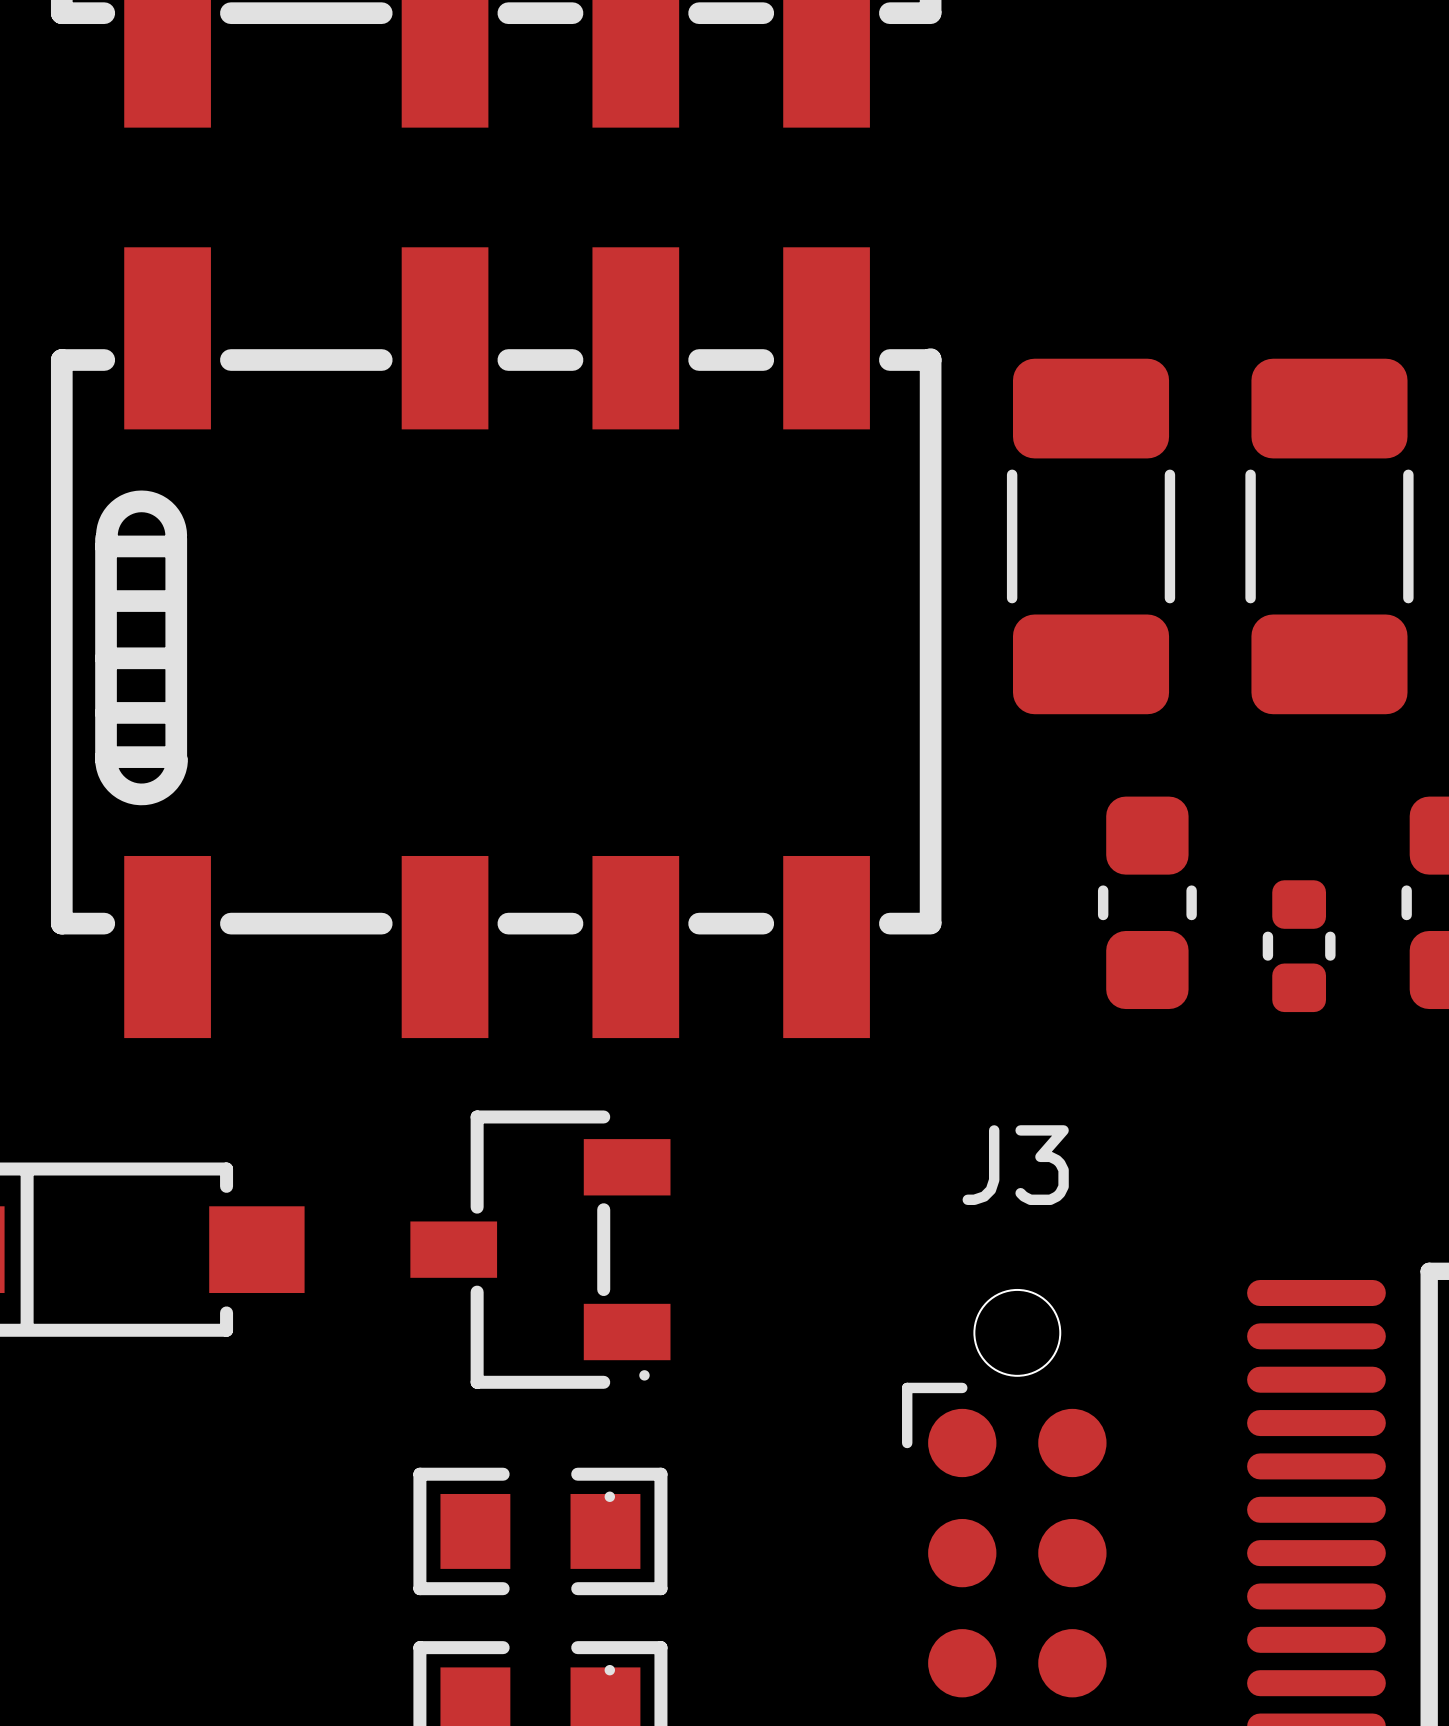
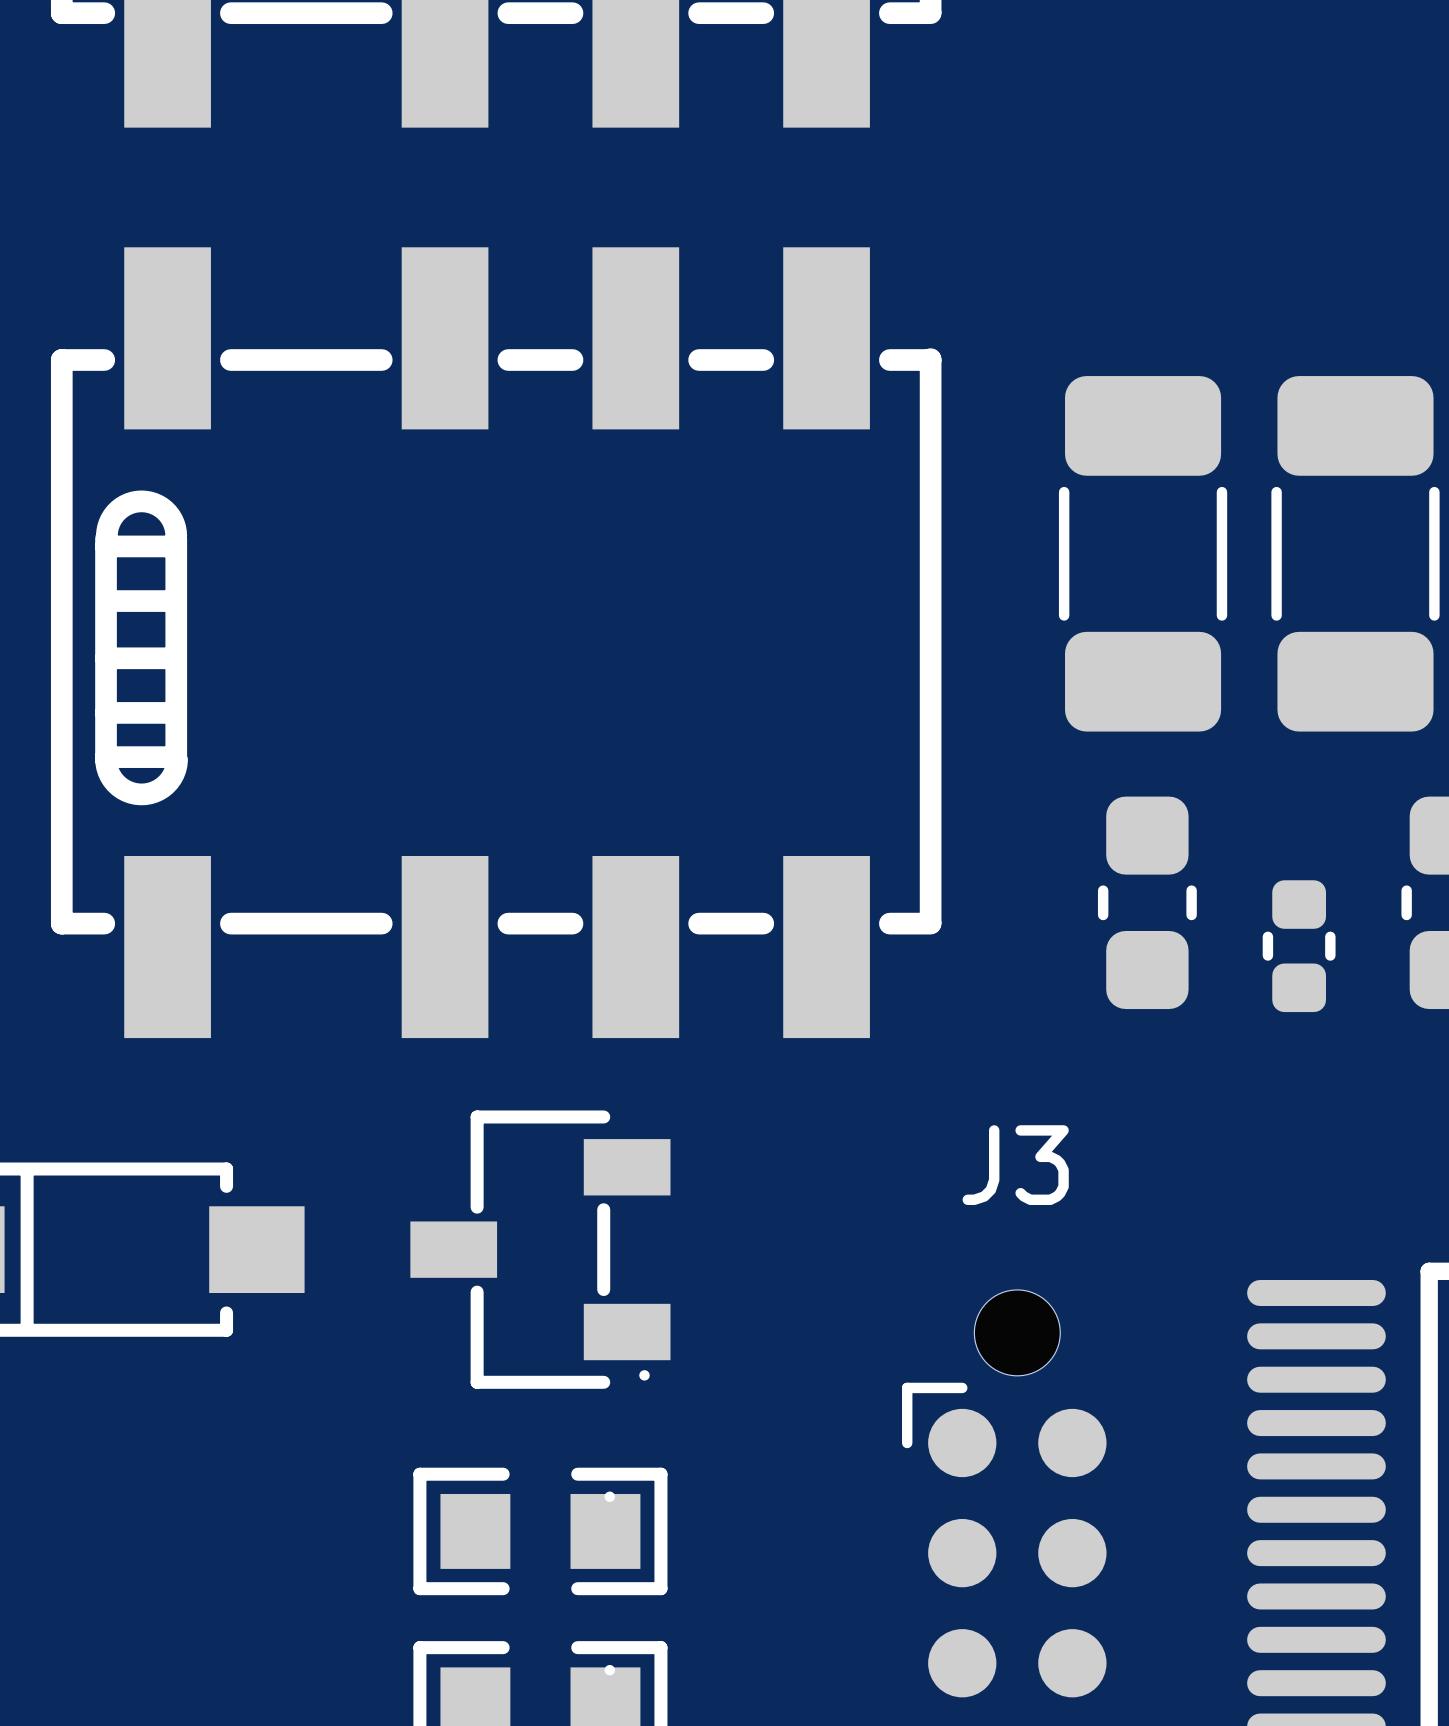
part position: (1091, 536) -> (1143, 553)
part position: (1329, 536) -> (1355, 553)

